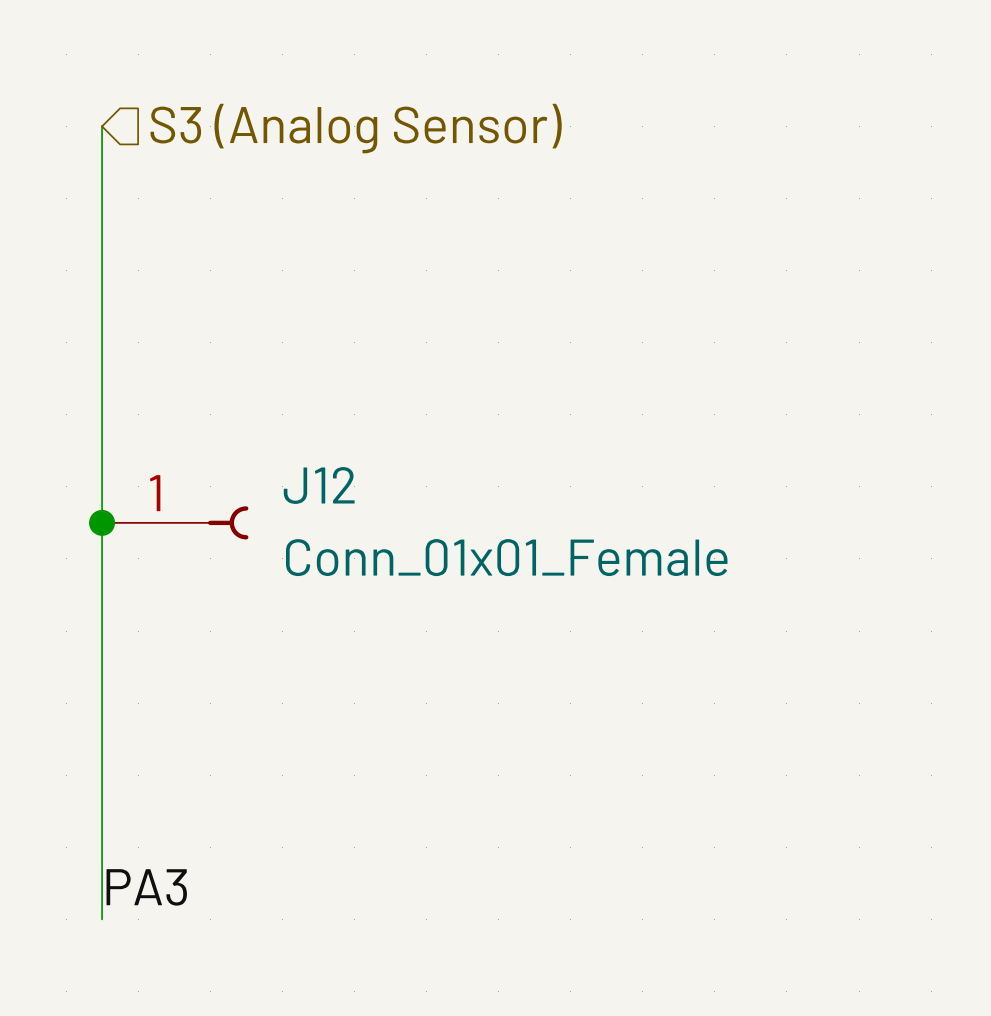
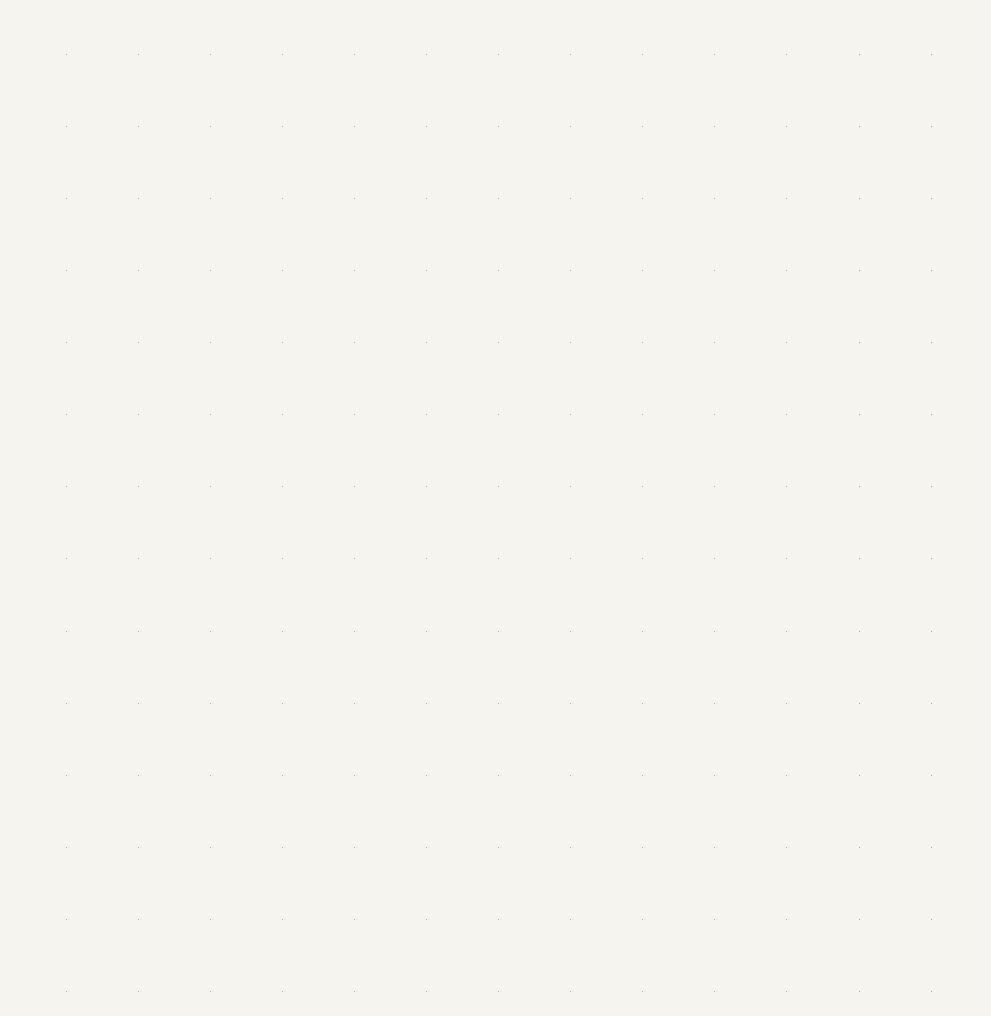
wire: (102, 126) (102, 919) -> none
hierarchical label: S3 (Analog Sensor) (356, 128) -> none
junction: (102, 522) -> none
J12: Conn_01x01_Female (175, 522) -> none
label: PA3 (146, 887) -> none

